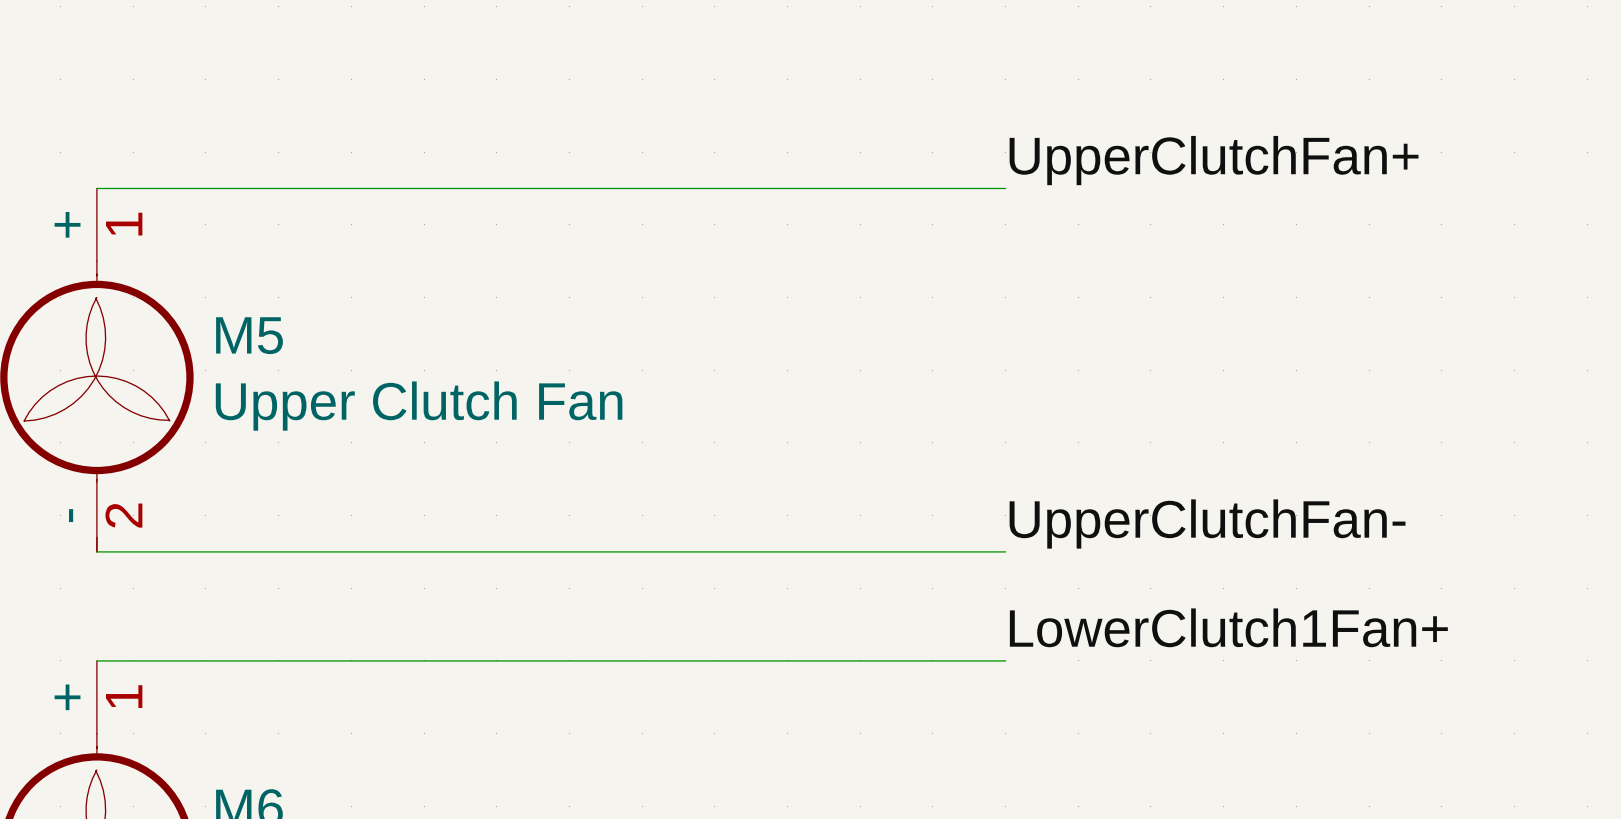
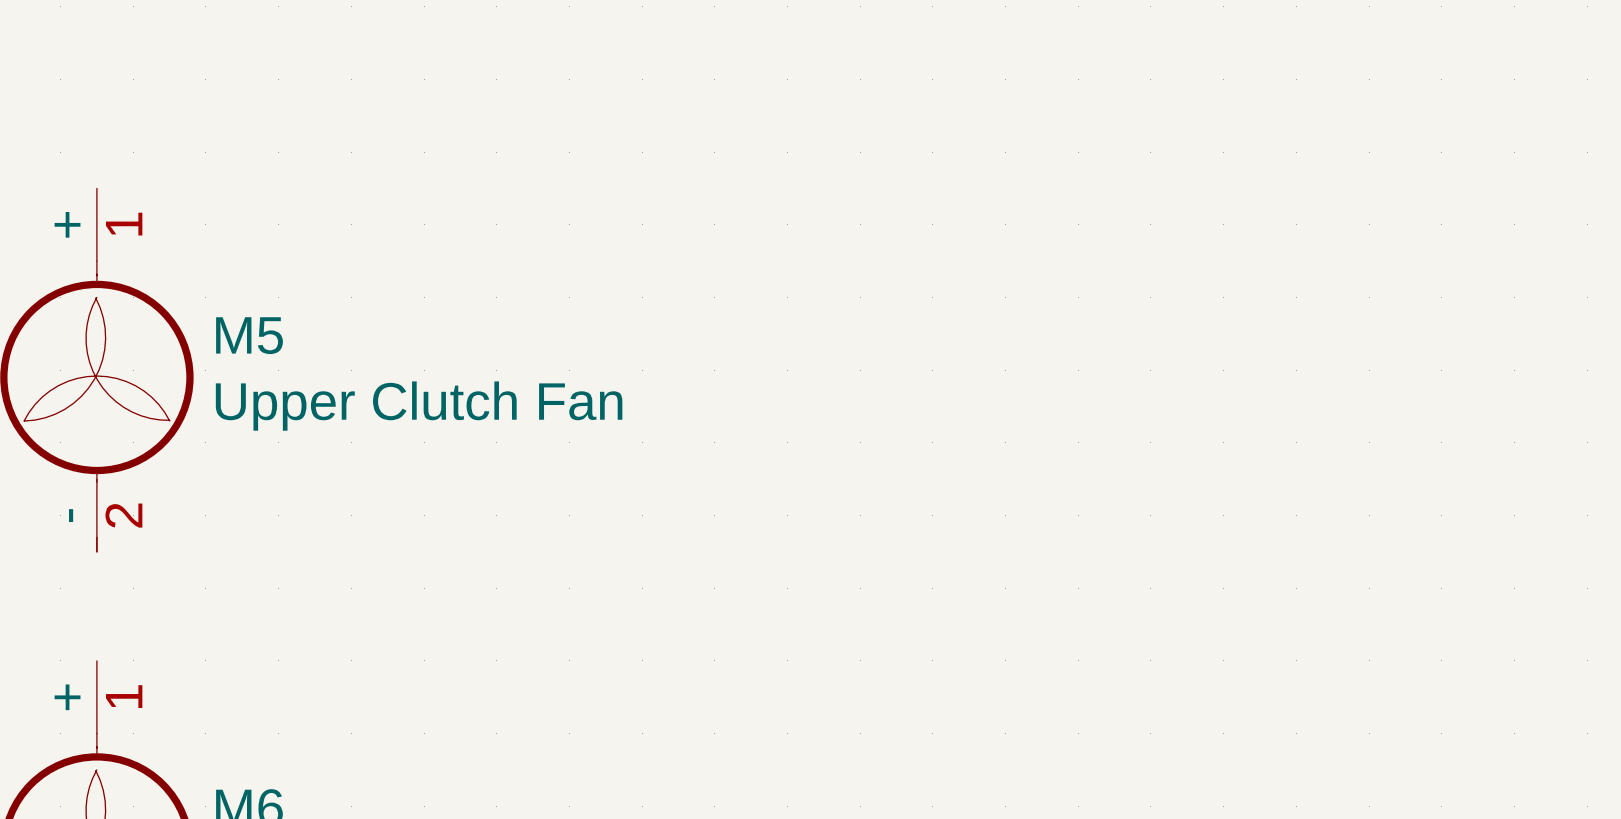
label: UpperClutchFan+ (1214, 160) -> none
wire: (96, 188) (1005, 188) -> none
label: UpperClutchFan- (1207, 524) -> none
wire: (96, 551) (1005, 551) -> none
label: LowerClutch1Fan+ (1228, 627) -> none
wire: (96, 660) (1005, 660) -> none

